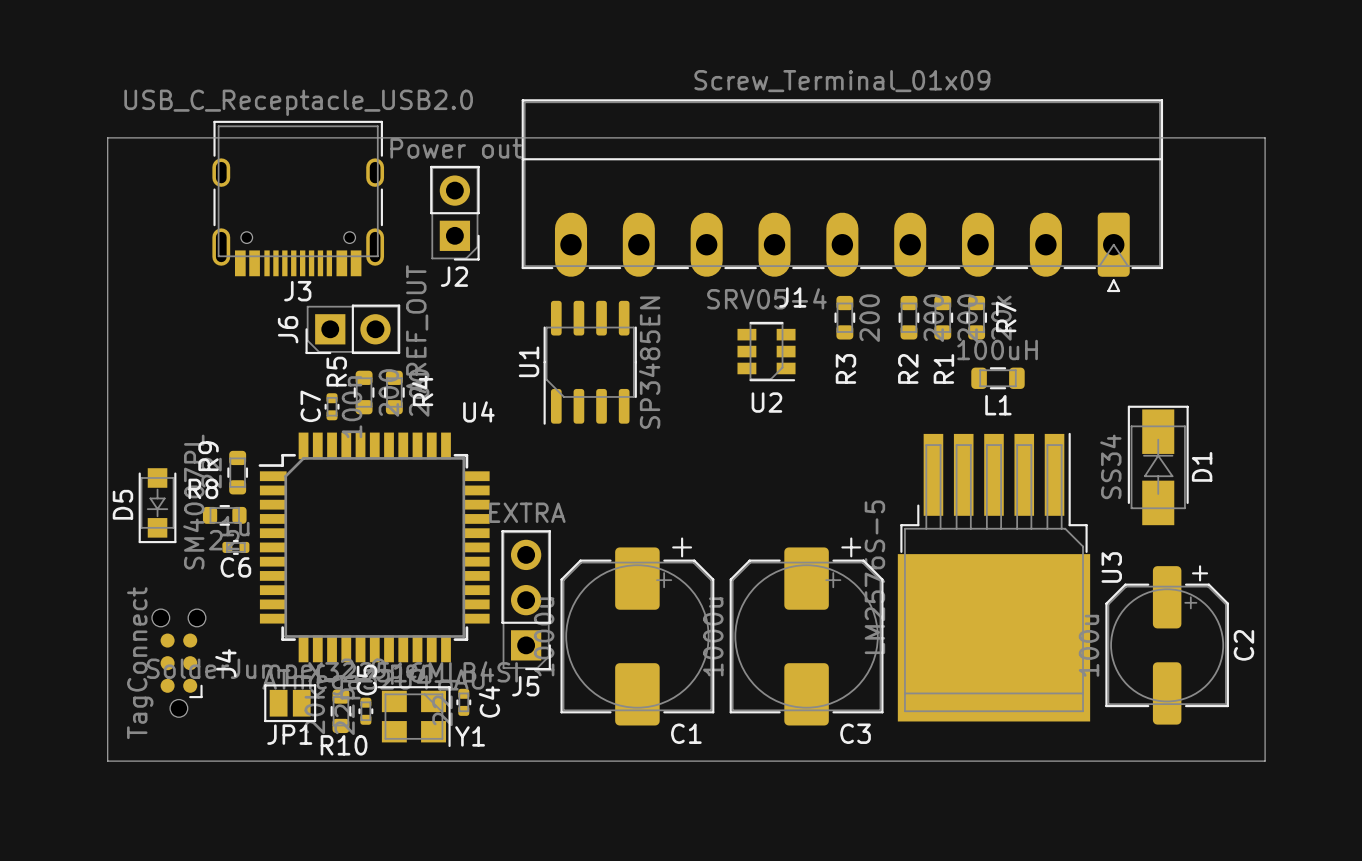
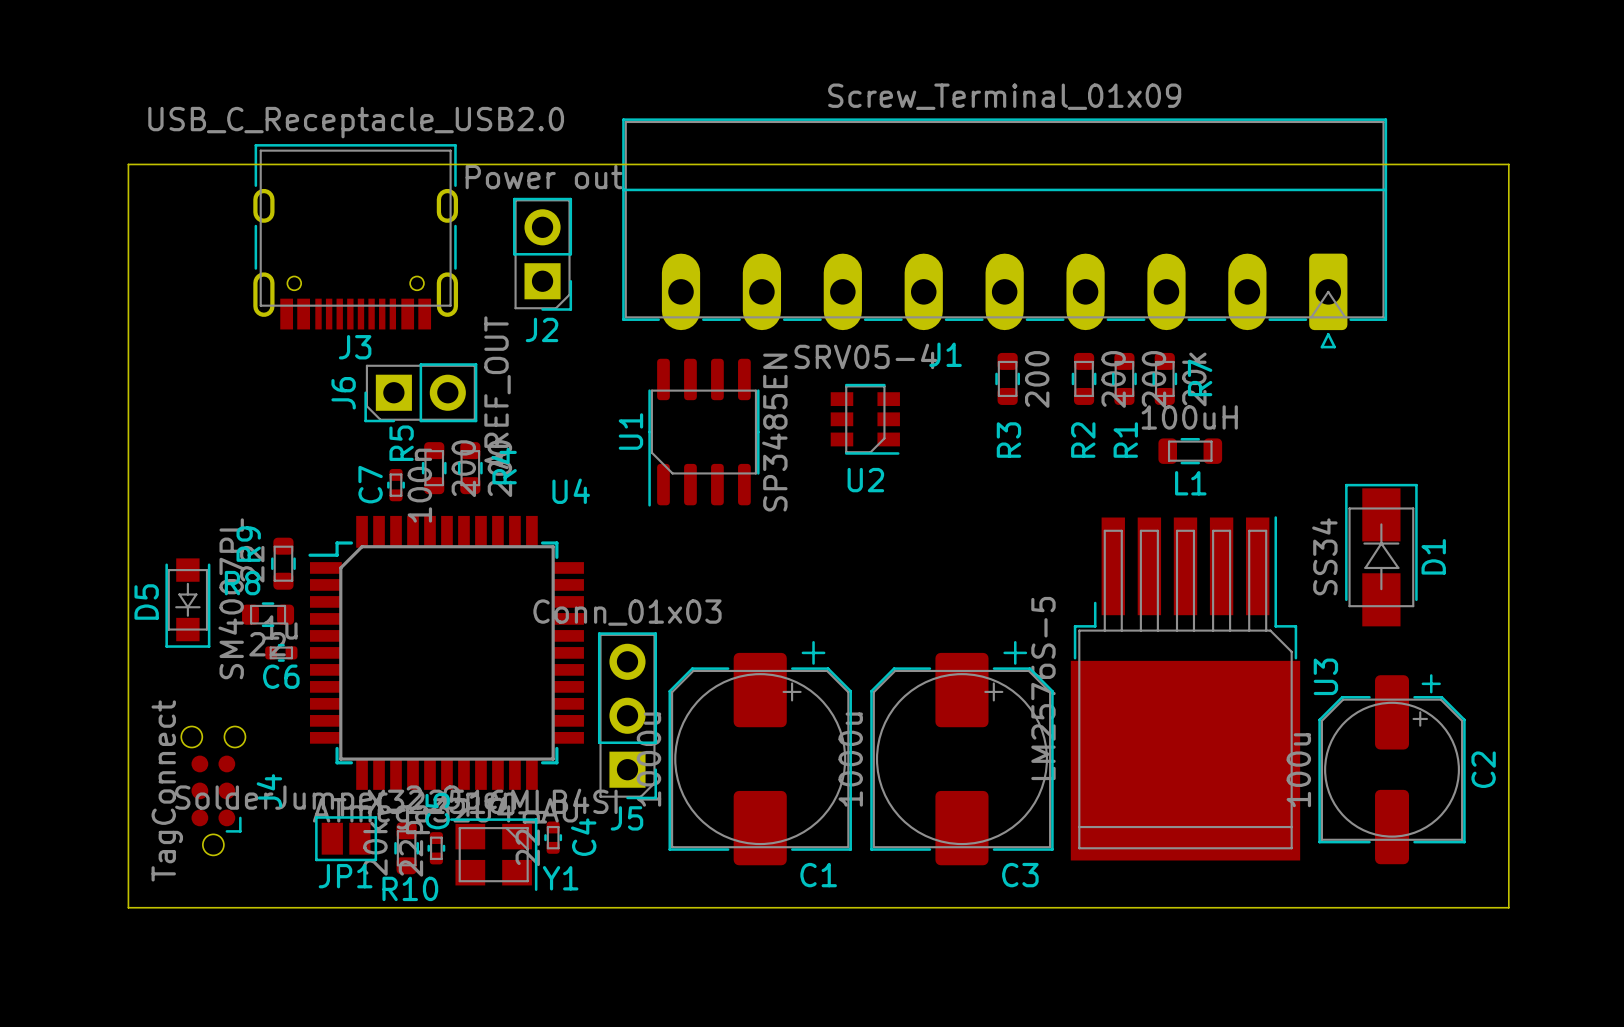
U2 position: (766, 351) -> (865, 419)
J5 value: EXTRA (527, 512) -> Conn_01x03 (627, 612)

